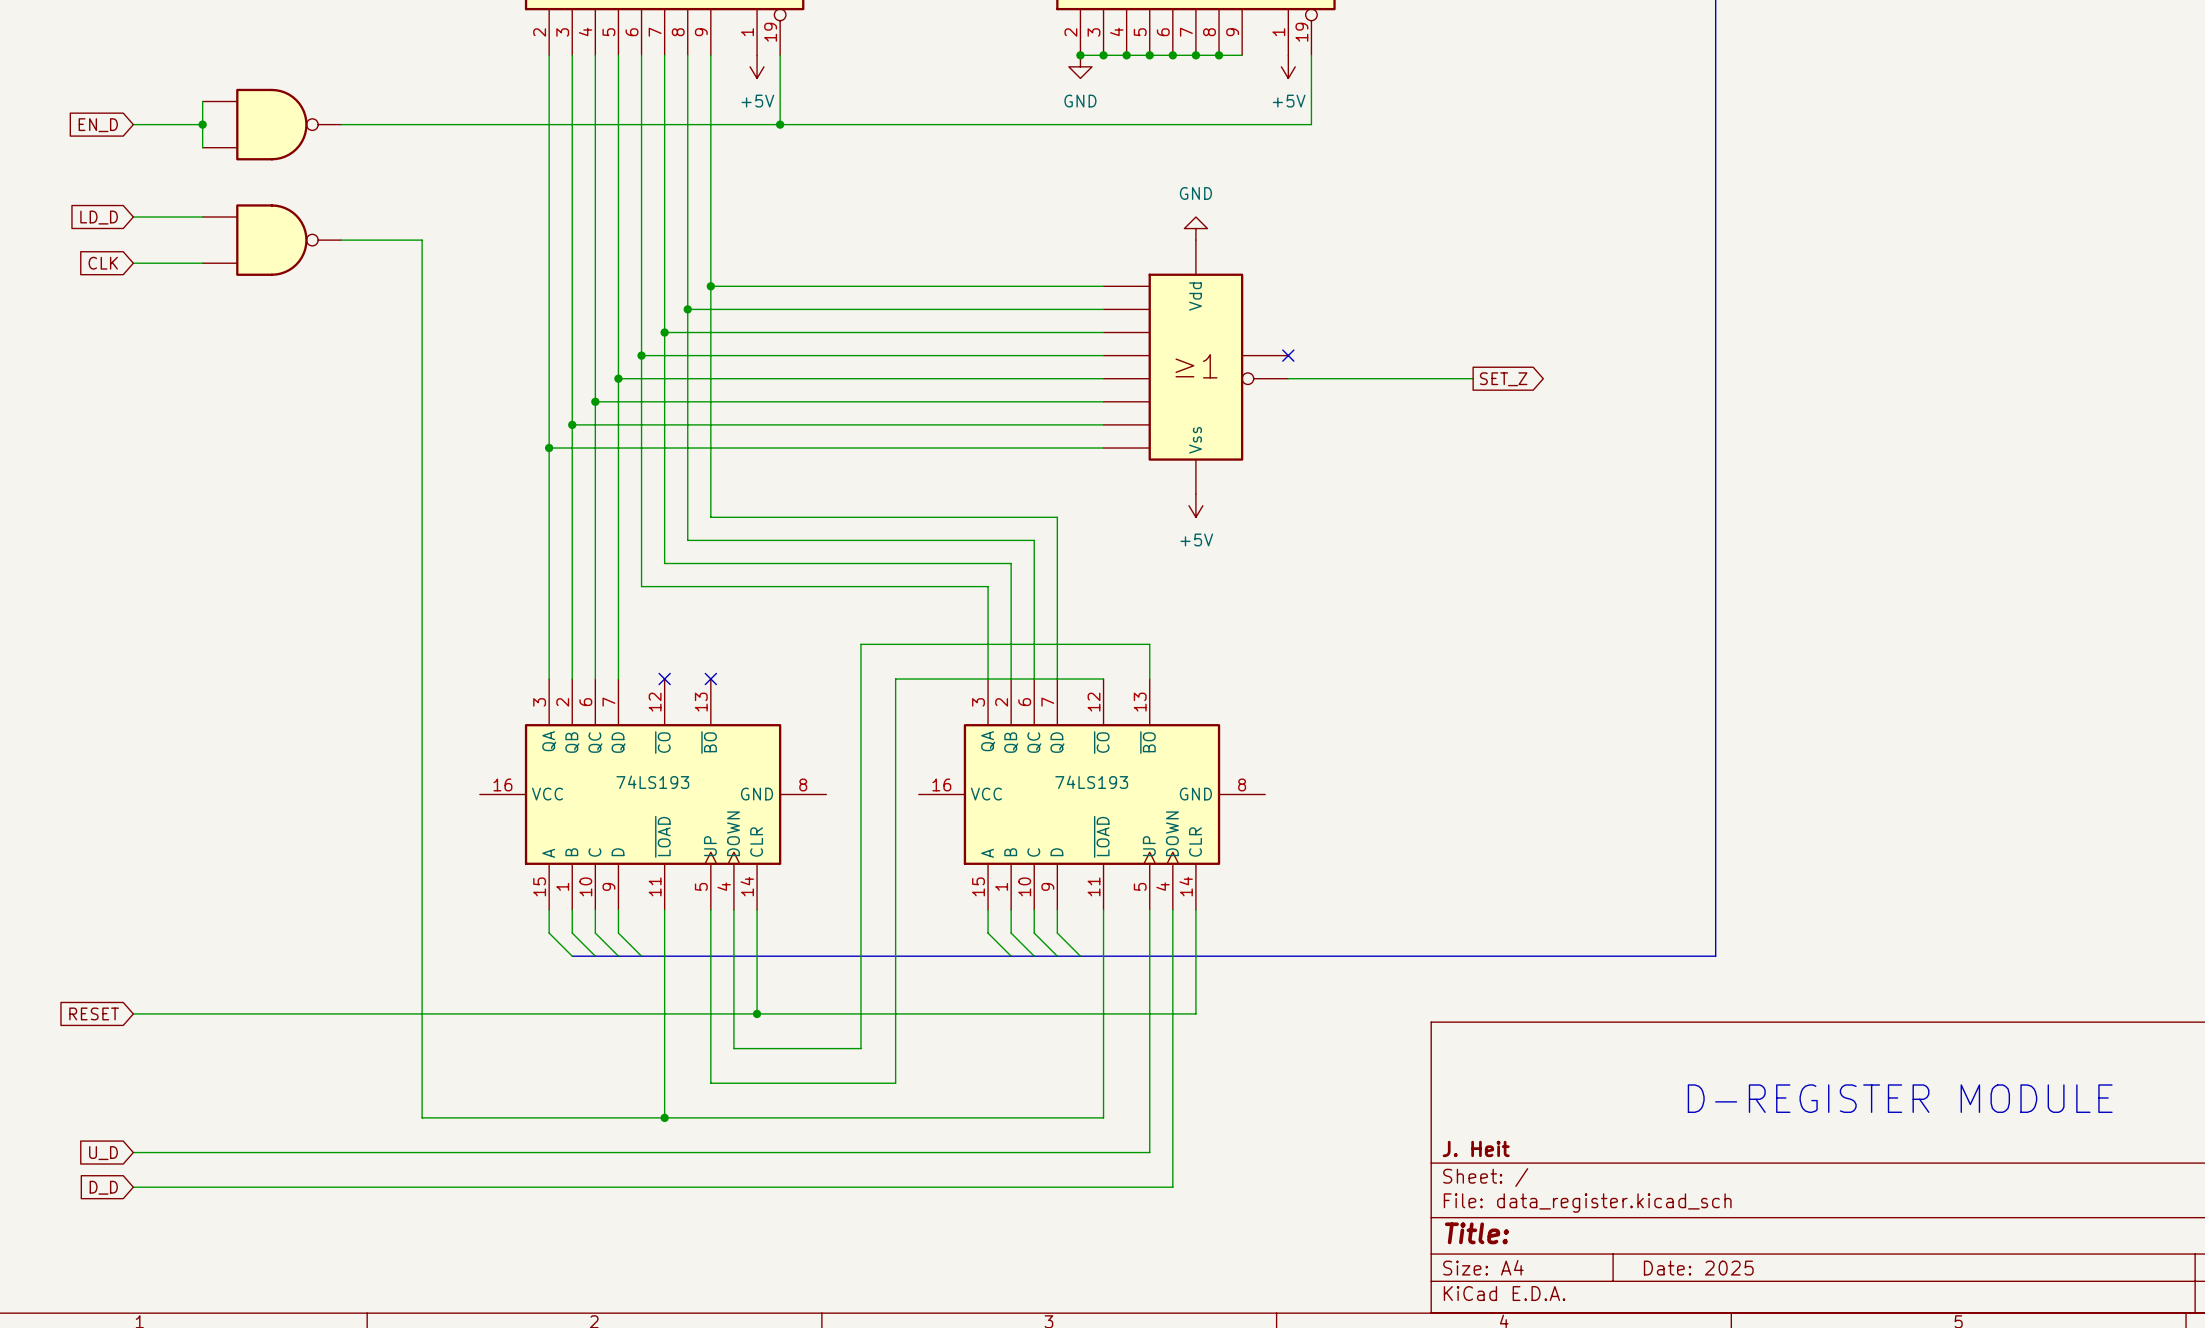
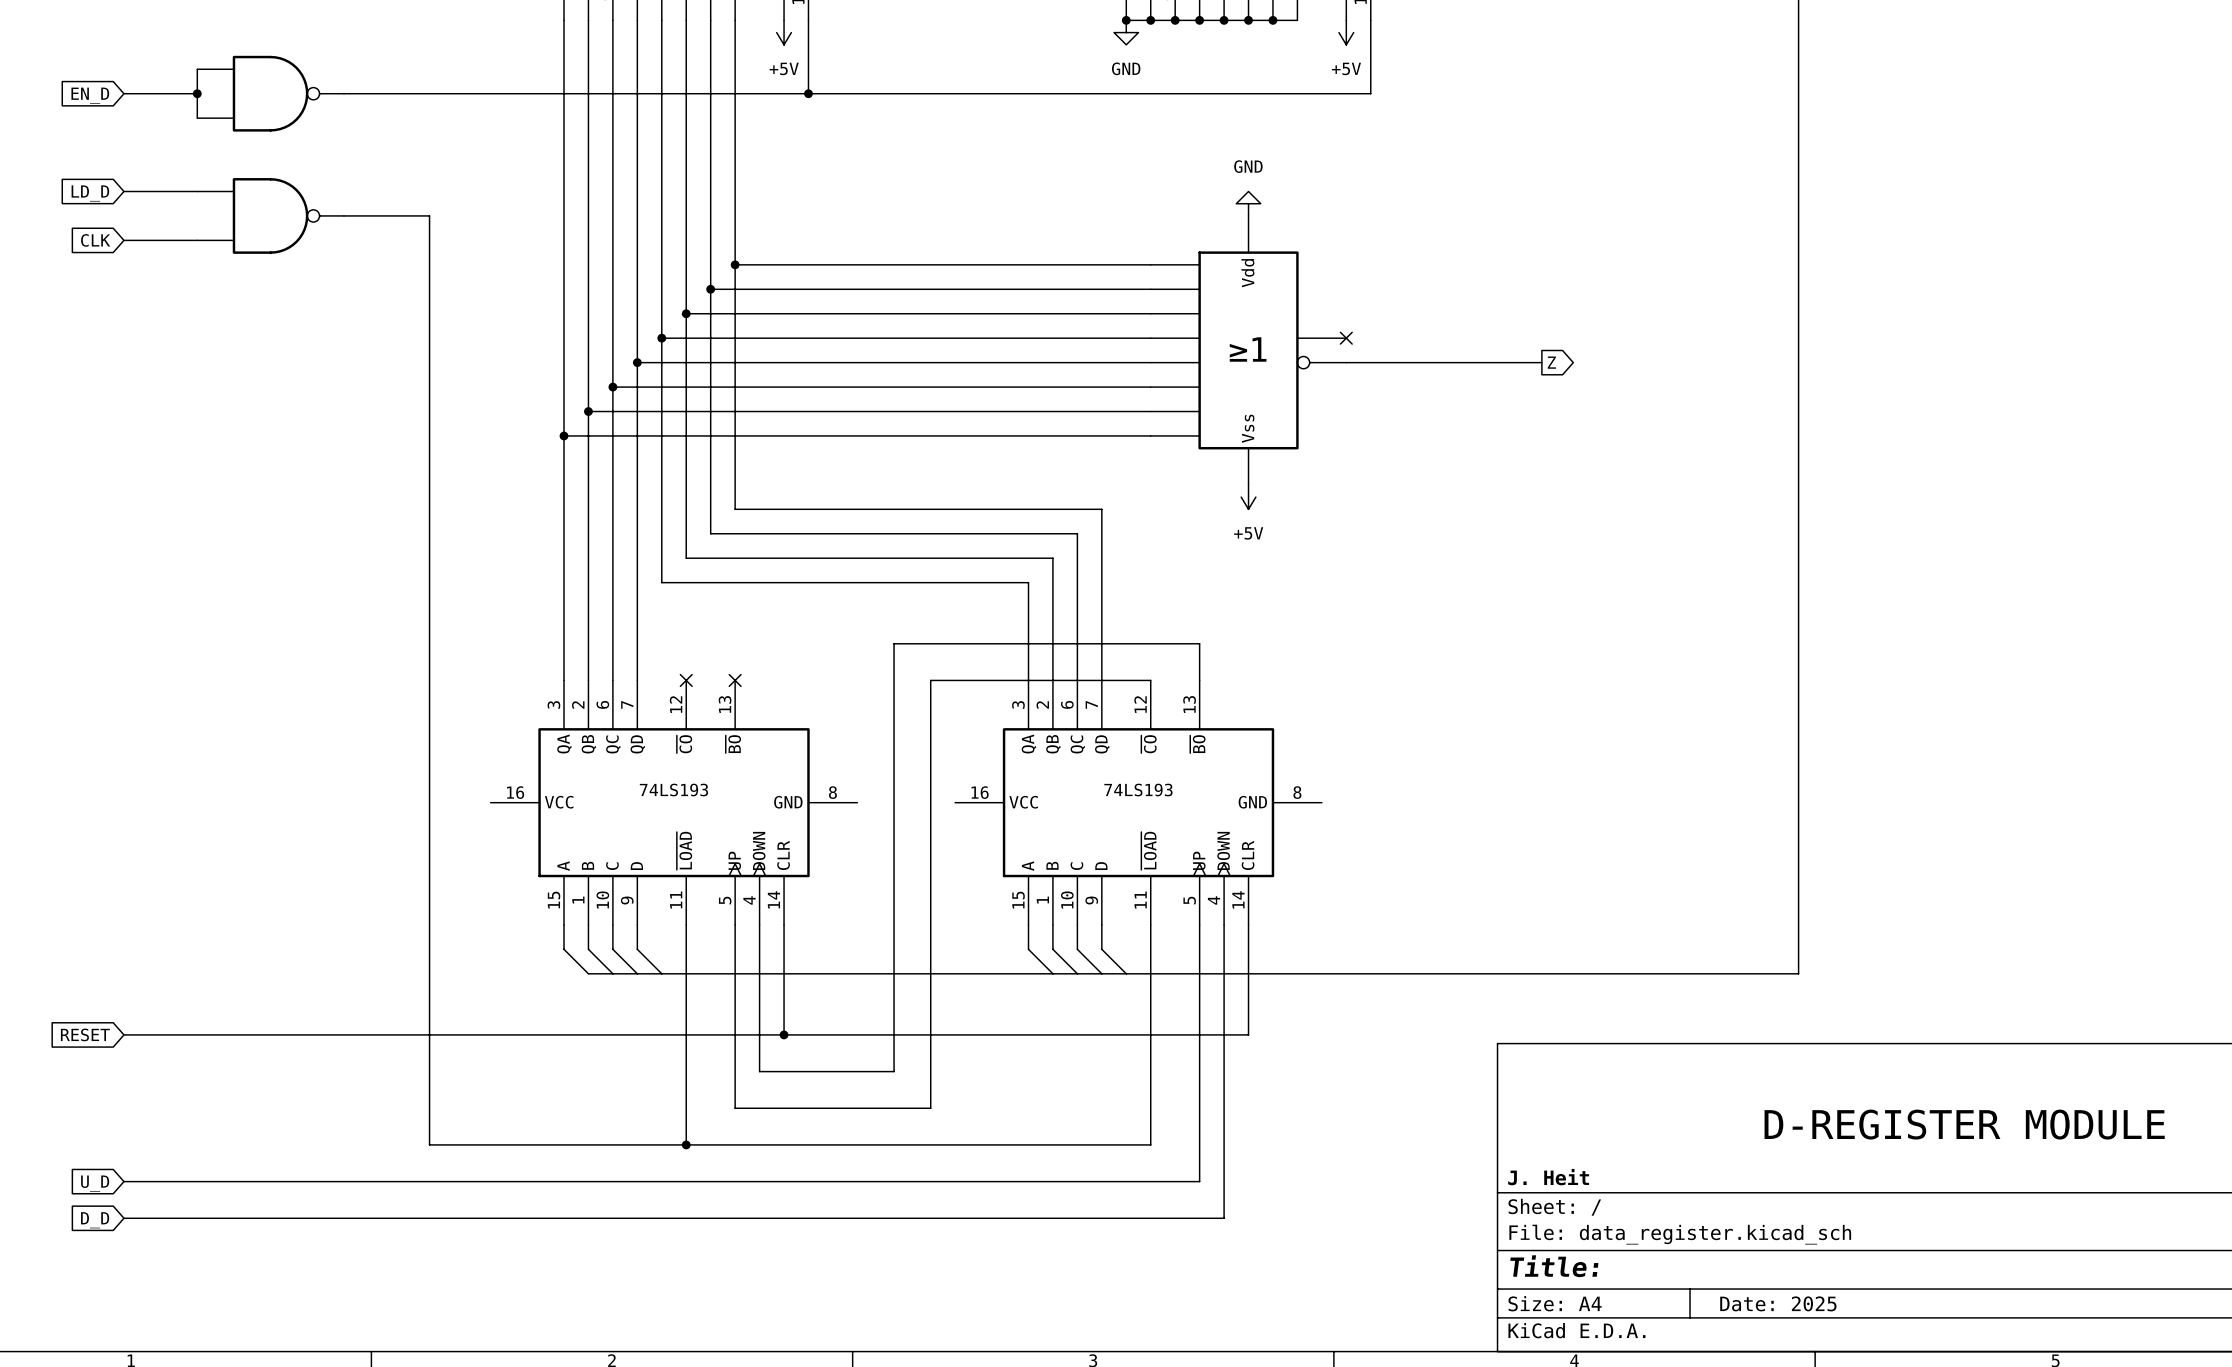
global label: SET_Z (1503, 379) -> Z (1551, 362)

